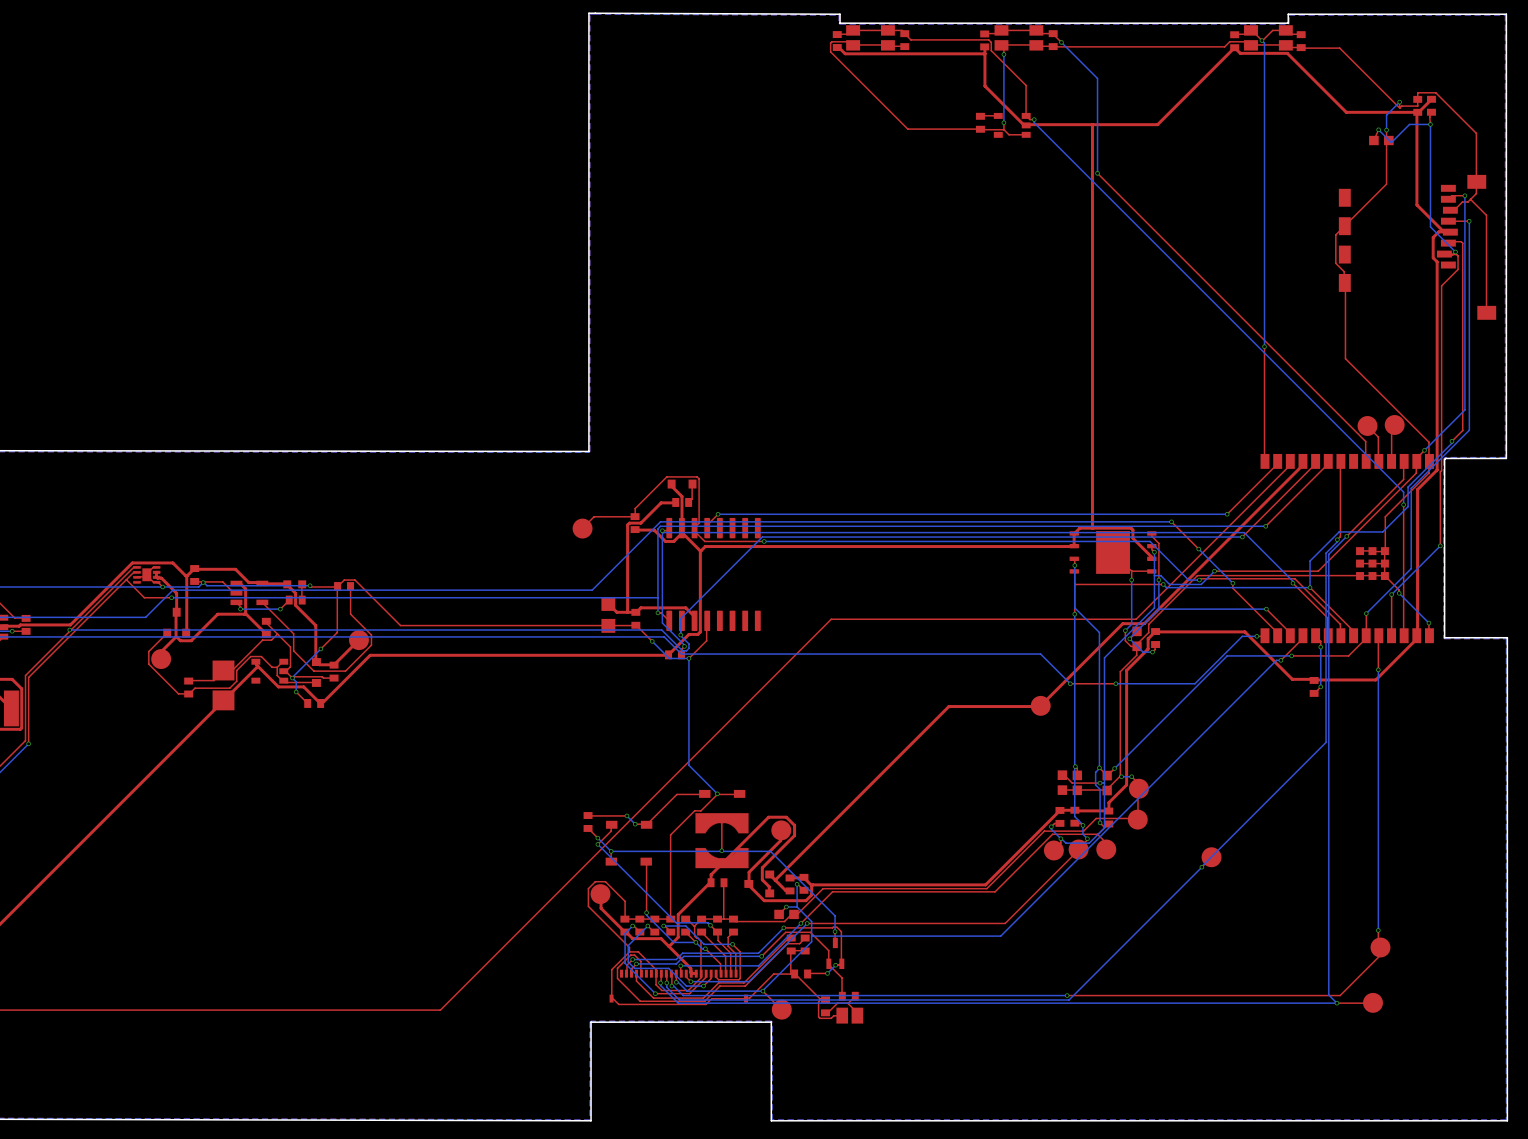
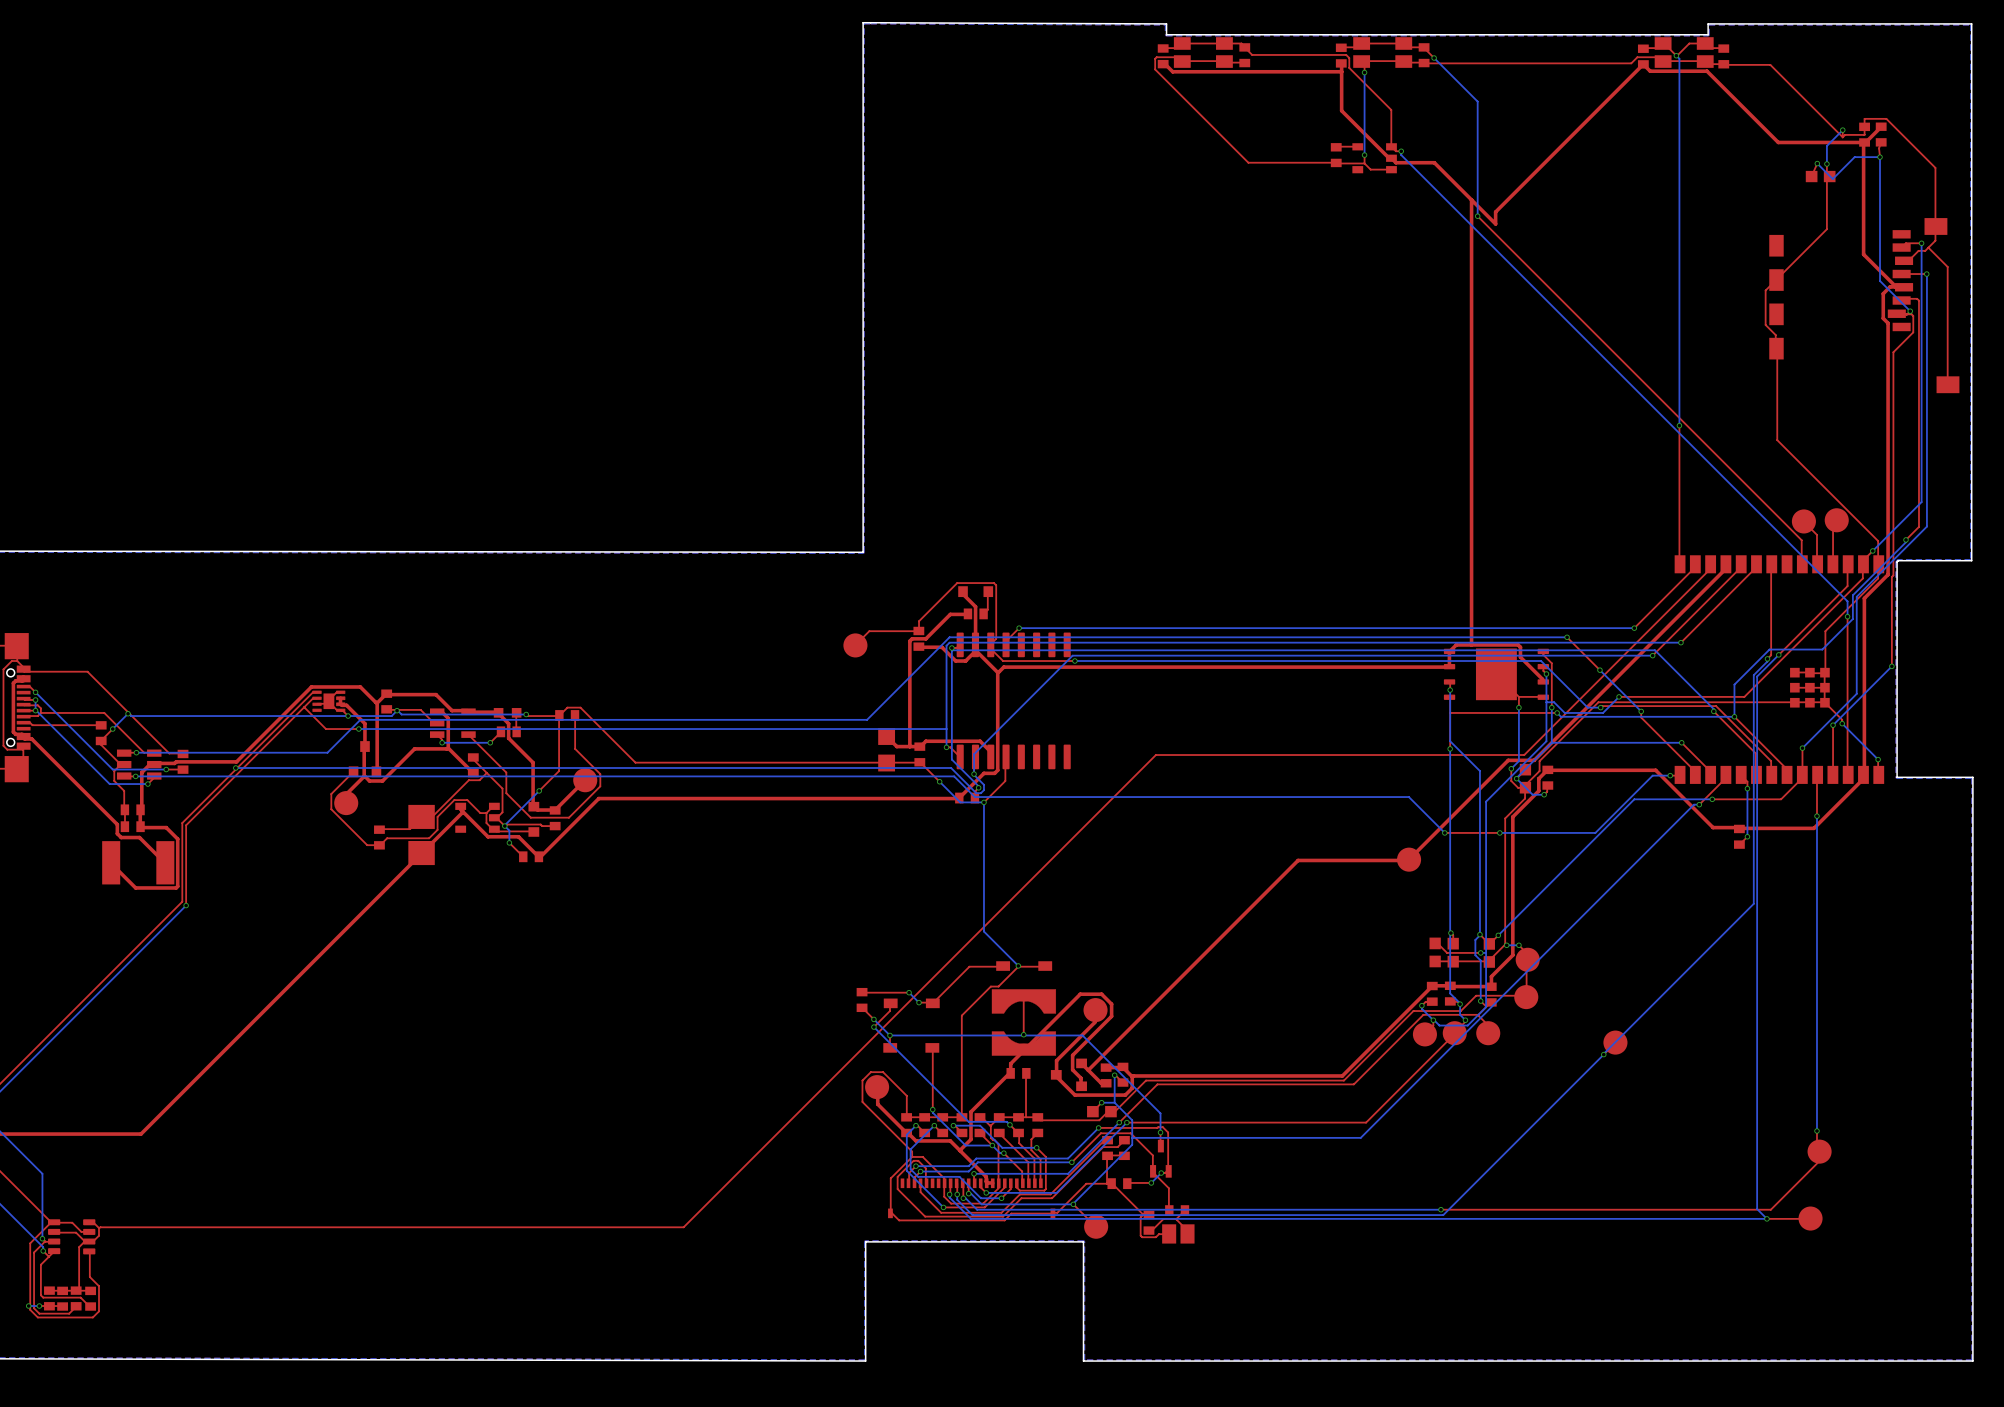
top track: (1092, 124) (1092, 159) -> none
top track: (1157, 124) (1026, 125) -> (1550, 157) (1495, 212) (1495, 223) (1434, 162) (1395, 162) (1391, 158)

